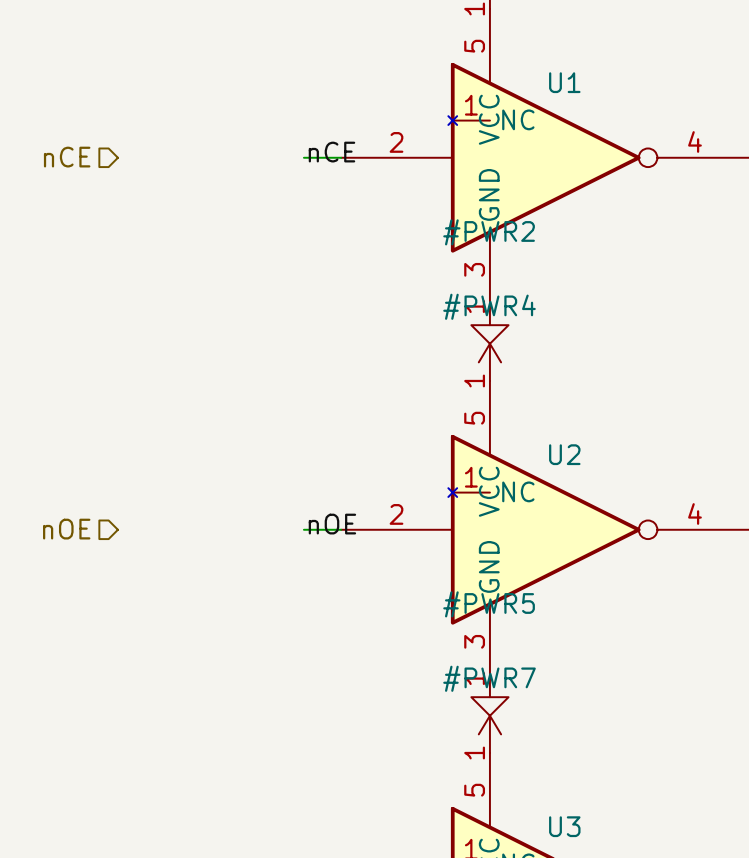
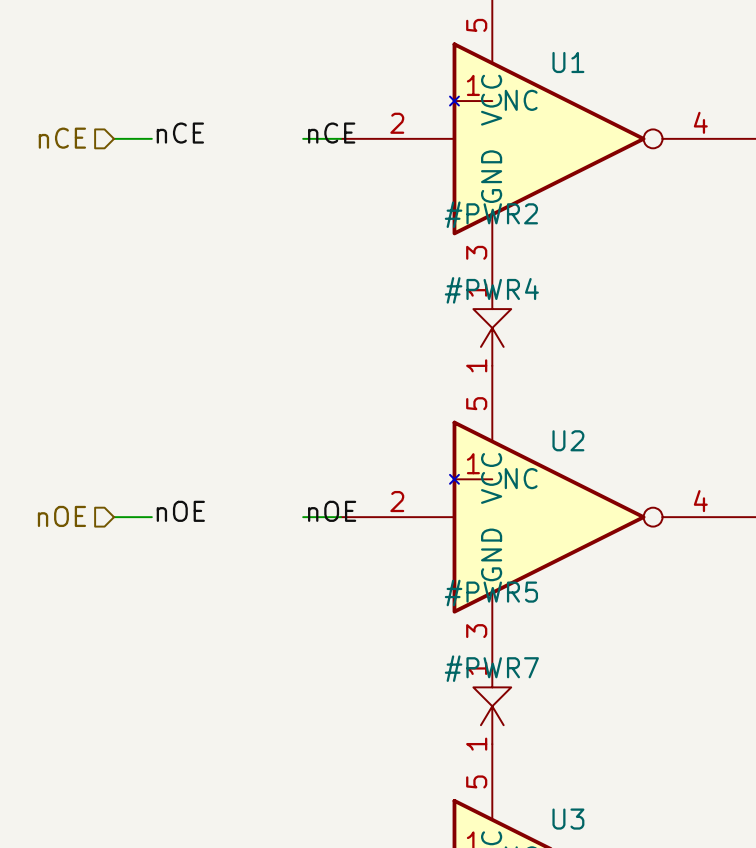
label: none -> nCE (180, 133)
wire: none -> (114, 138) (151, 138)
label: none -> nOE (180, 511)
wire: none -> (114, 517) (151, 517)

